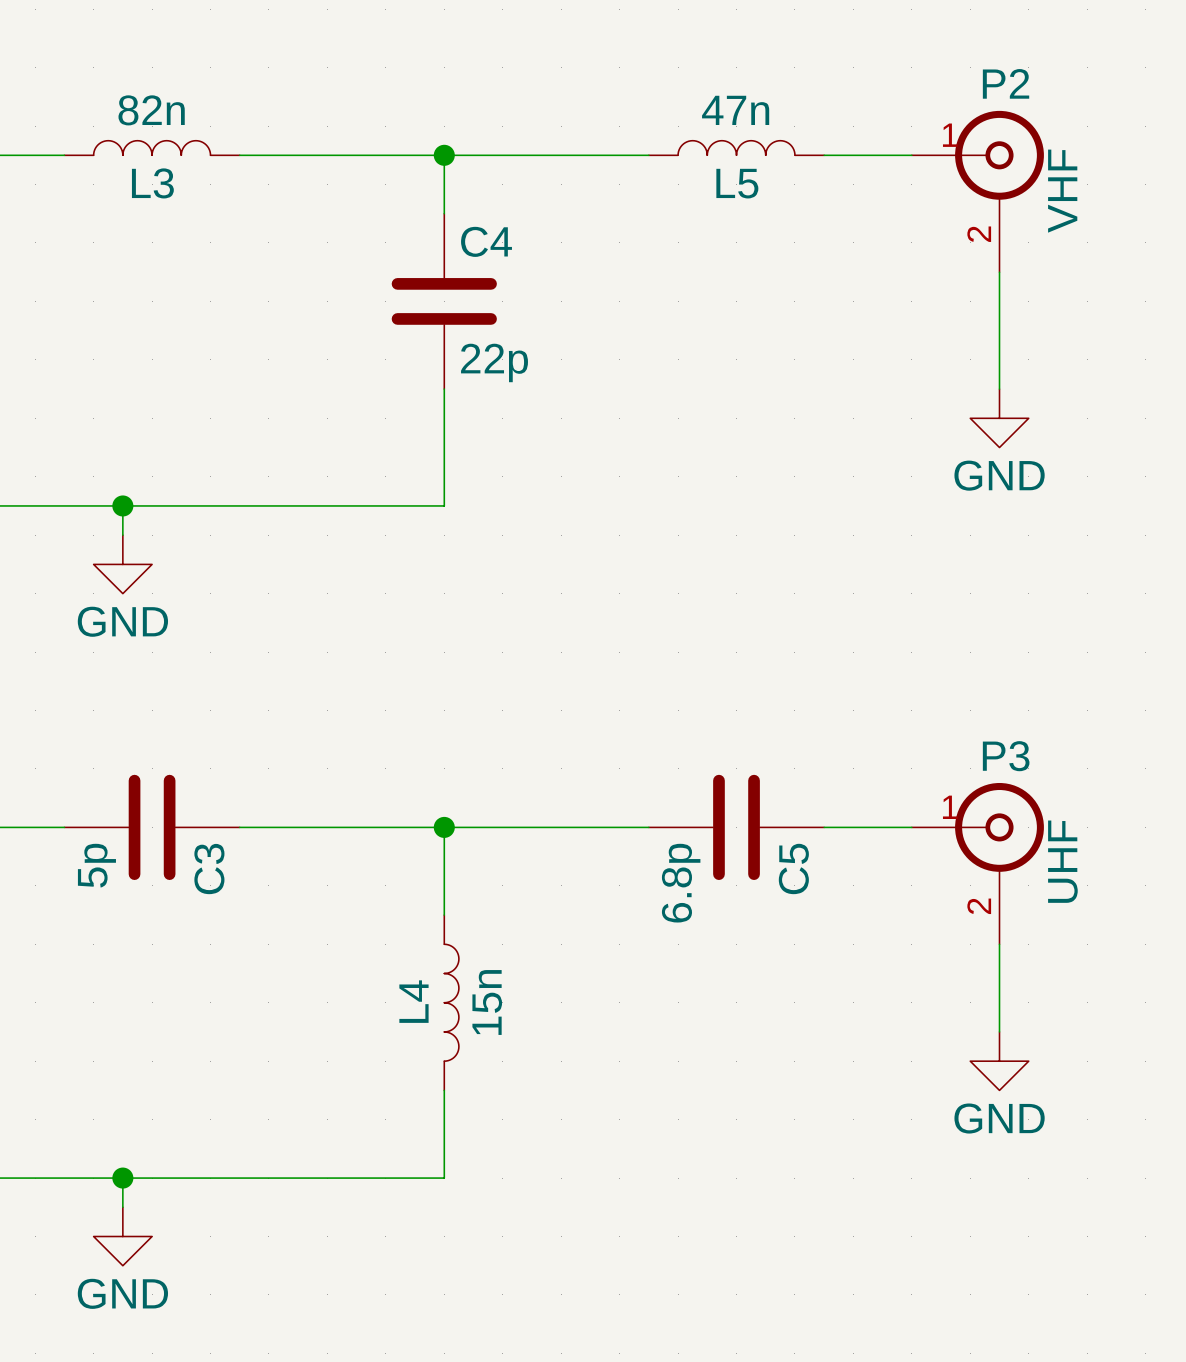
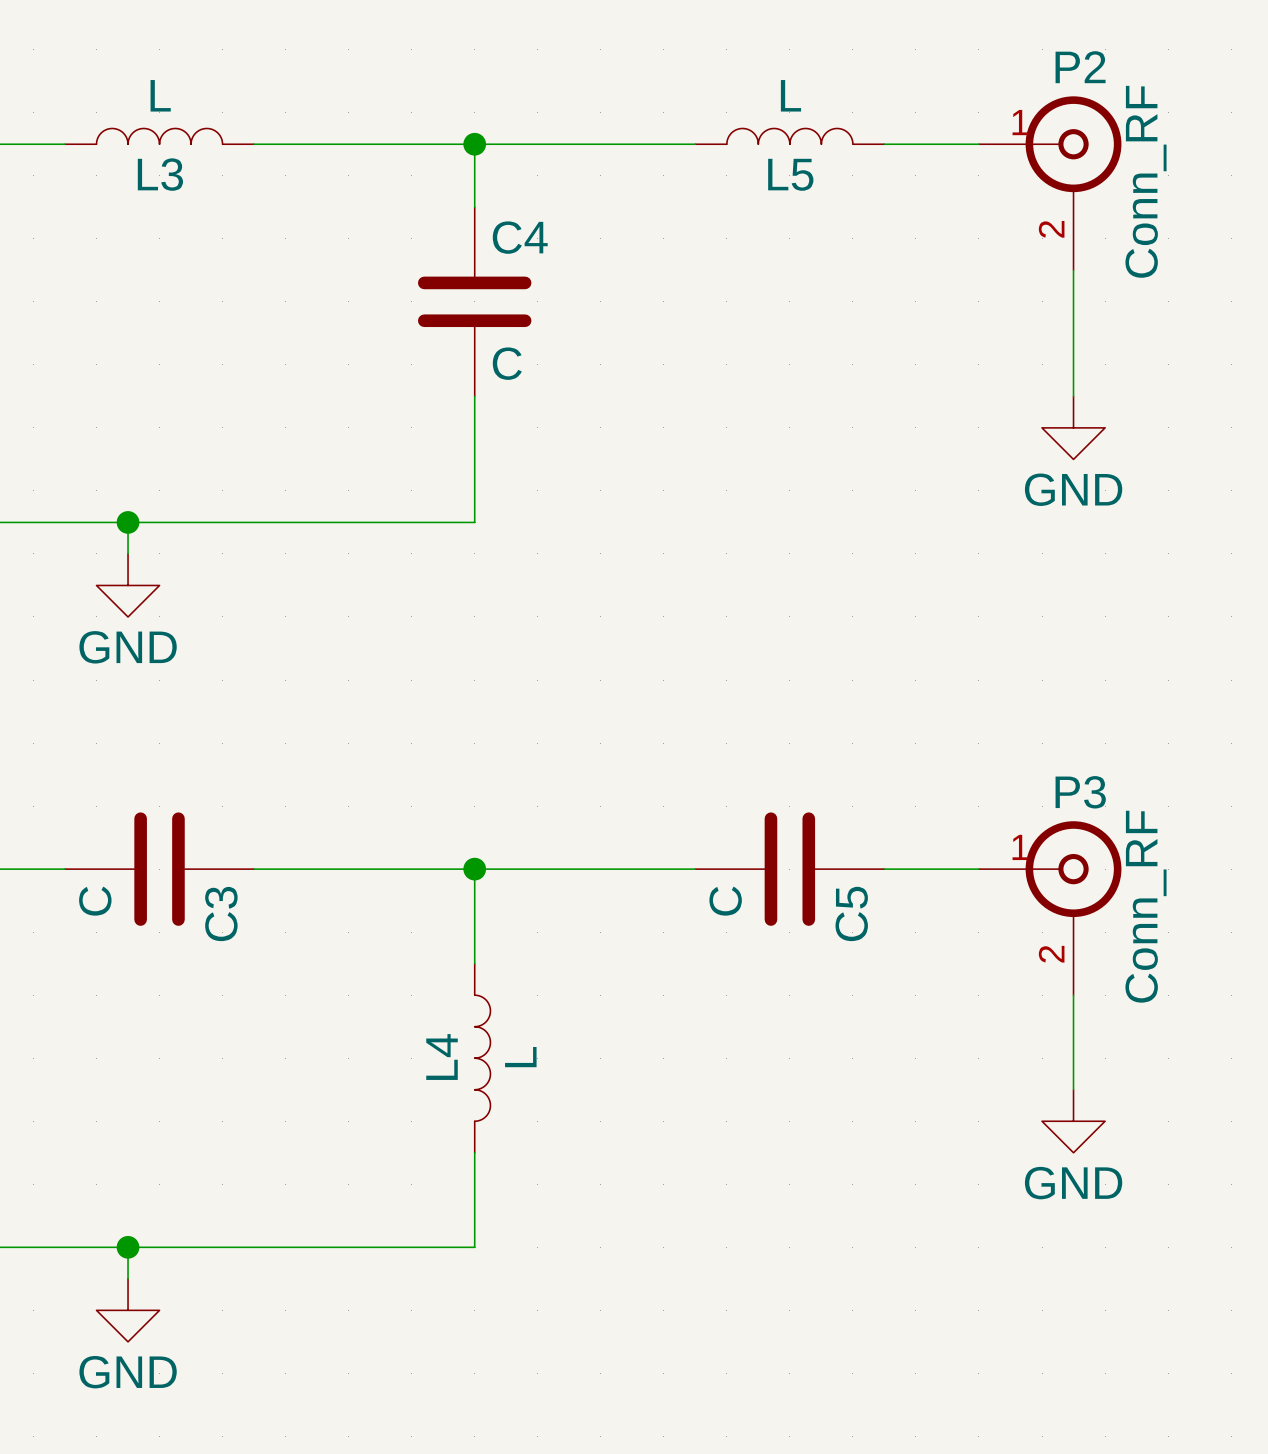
L3 value: 82n (151, 110) -> L (160, 95)
L5 value: 47n (735, 110) -> L (790, 95)
P2 value: VHF (1062, 191) -> Conn_RF (1145, 181)
C4 value: 22p (494, 362) -> C (507, 363)
P3 value: UHF (1062, 861) -> Conn_RF (1145, 906)
C3 value: 5p (96, 865) -> C (95, 901)
C5 value: 6.8p (681, 883) -> C (725, 901)
L4 value: 15n (487, 1002) -> L (520, 1057)

